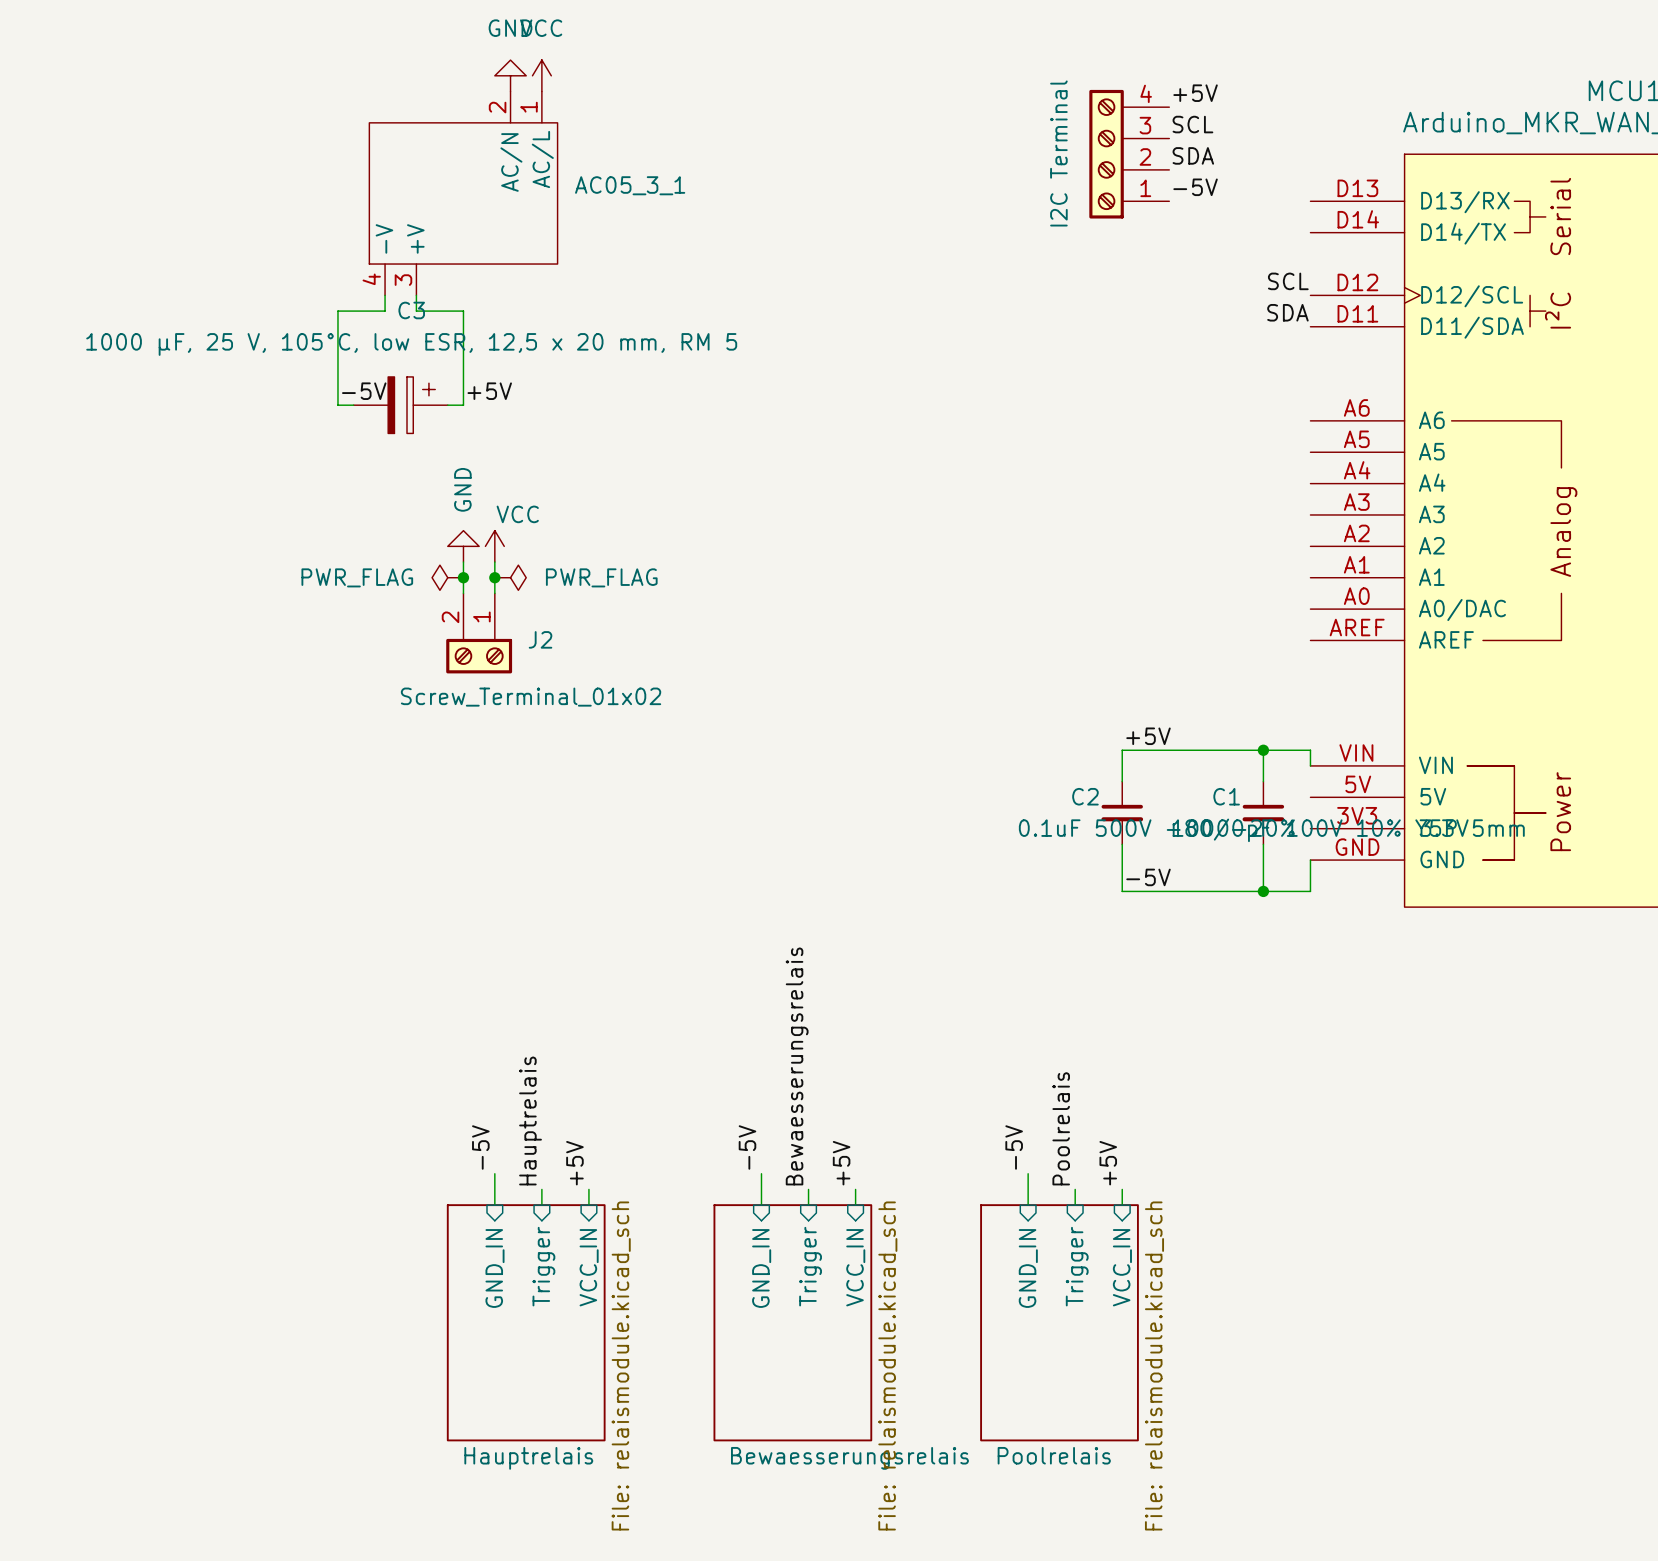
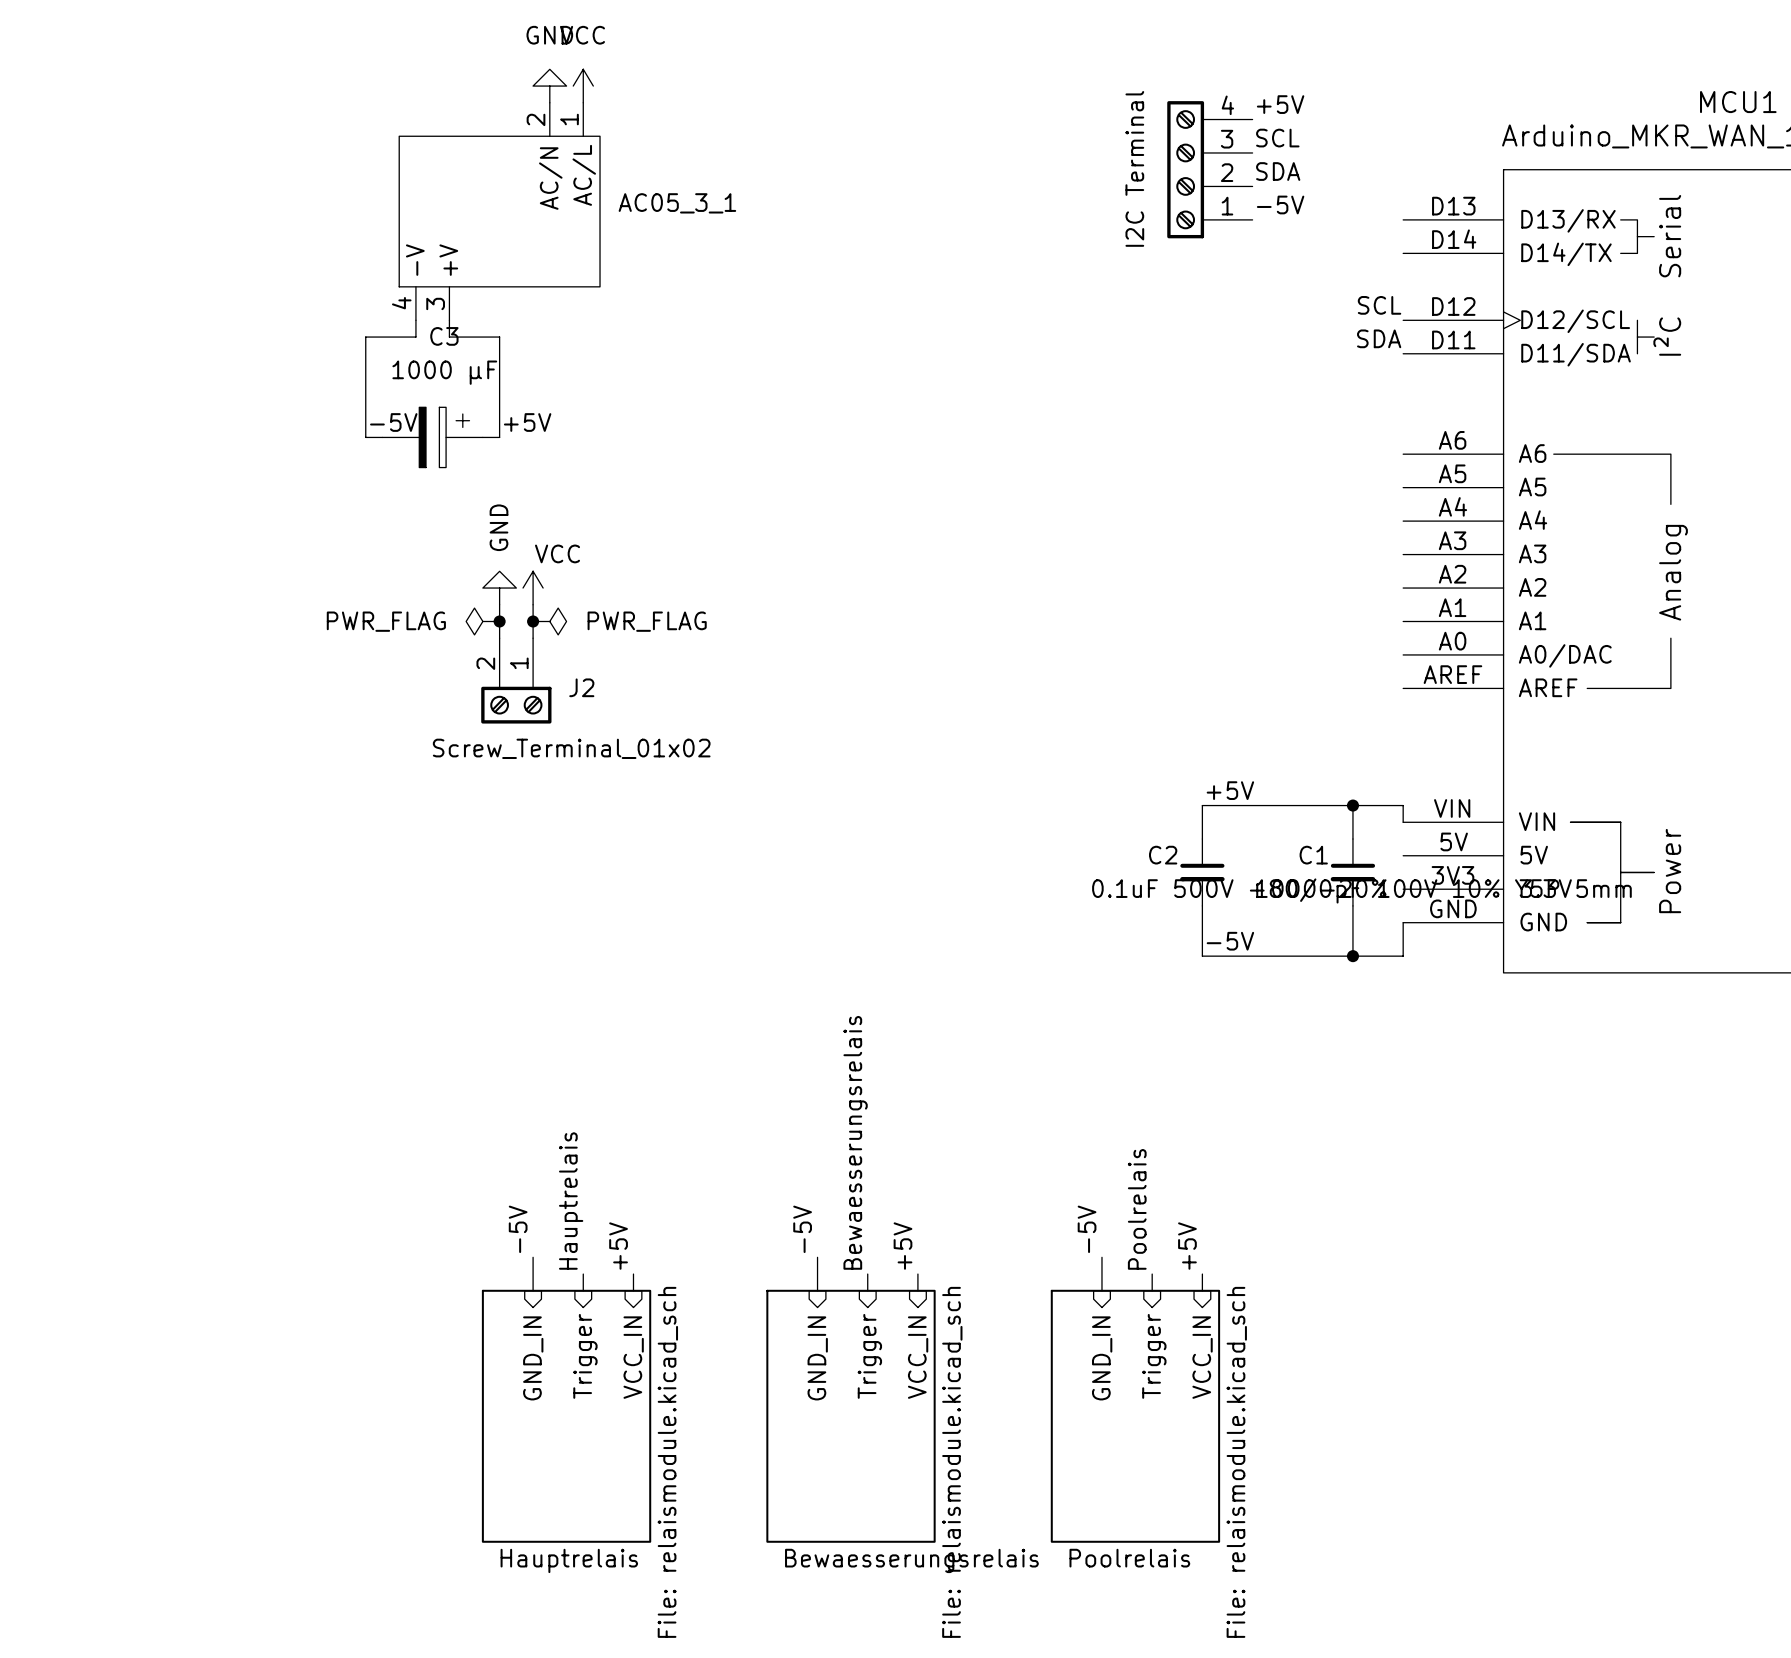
C3 value: 1000 µF, 25 V, 105°C, low ESR, 12,5 x 20 mm, RM 5 (411, 344) -> 1000 µF (444, 372)

